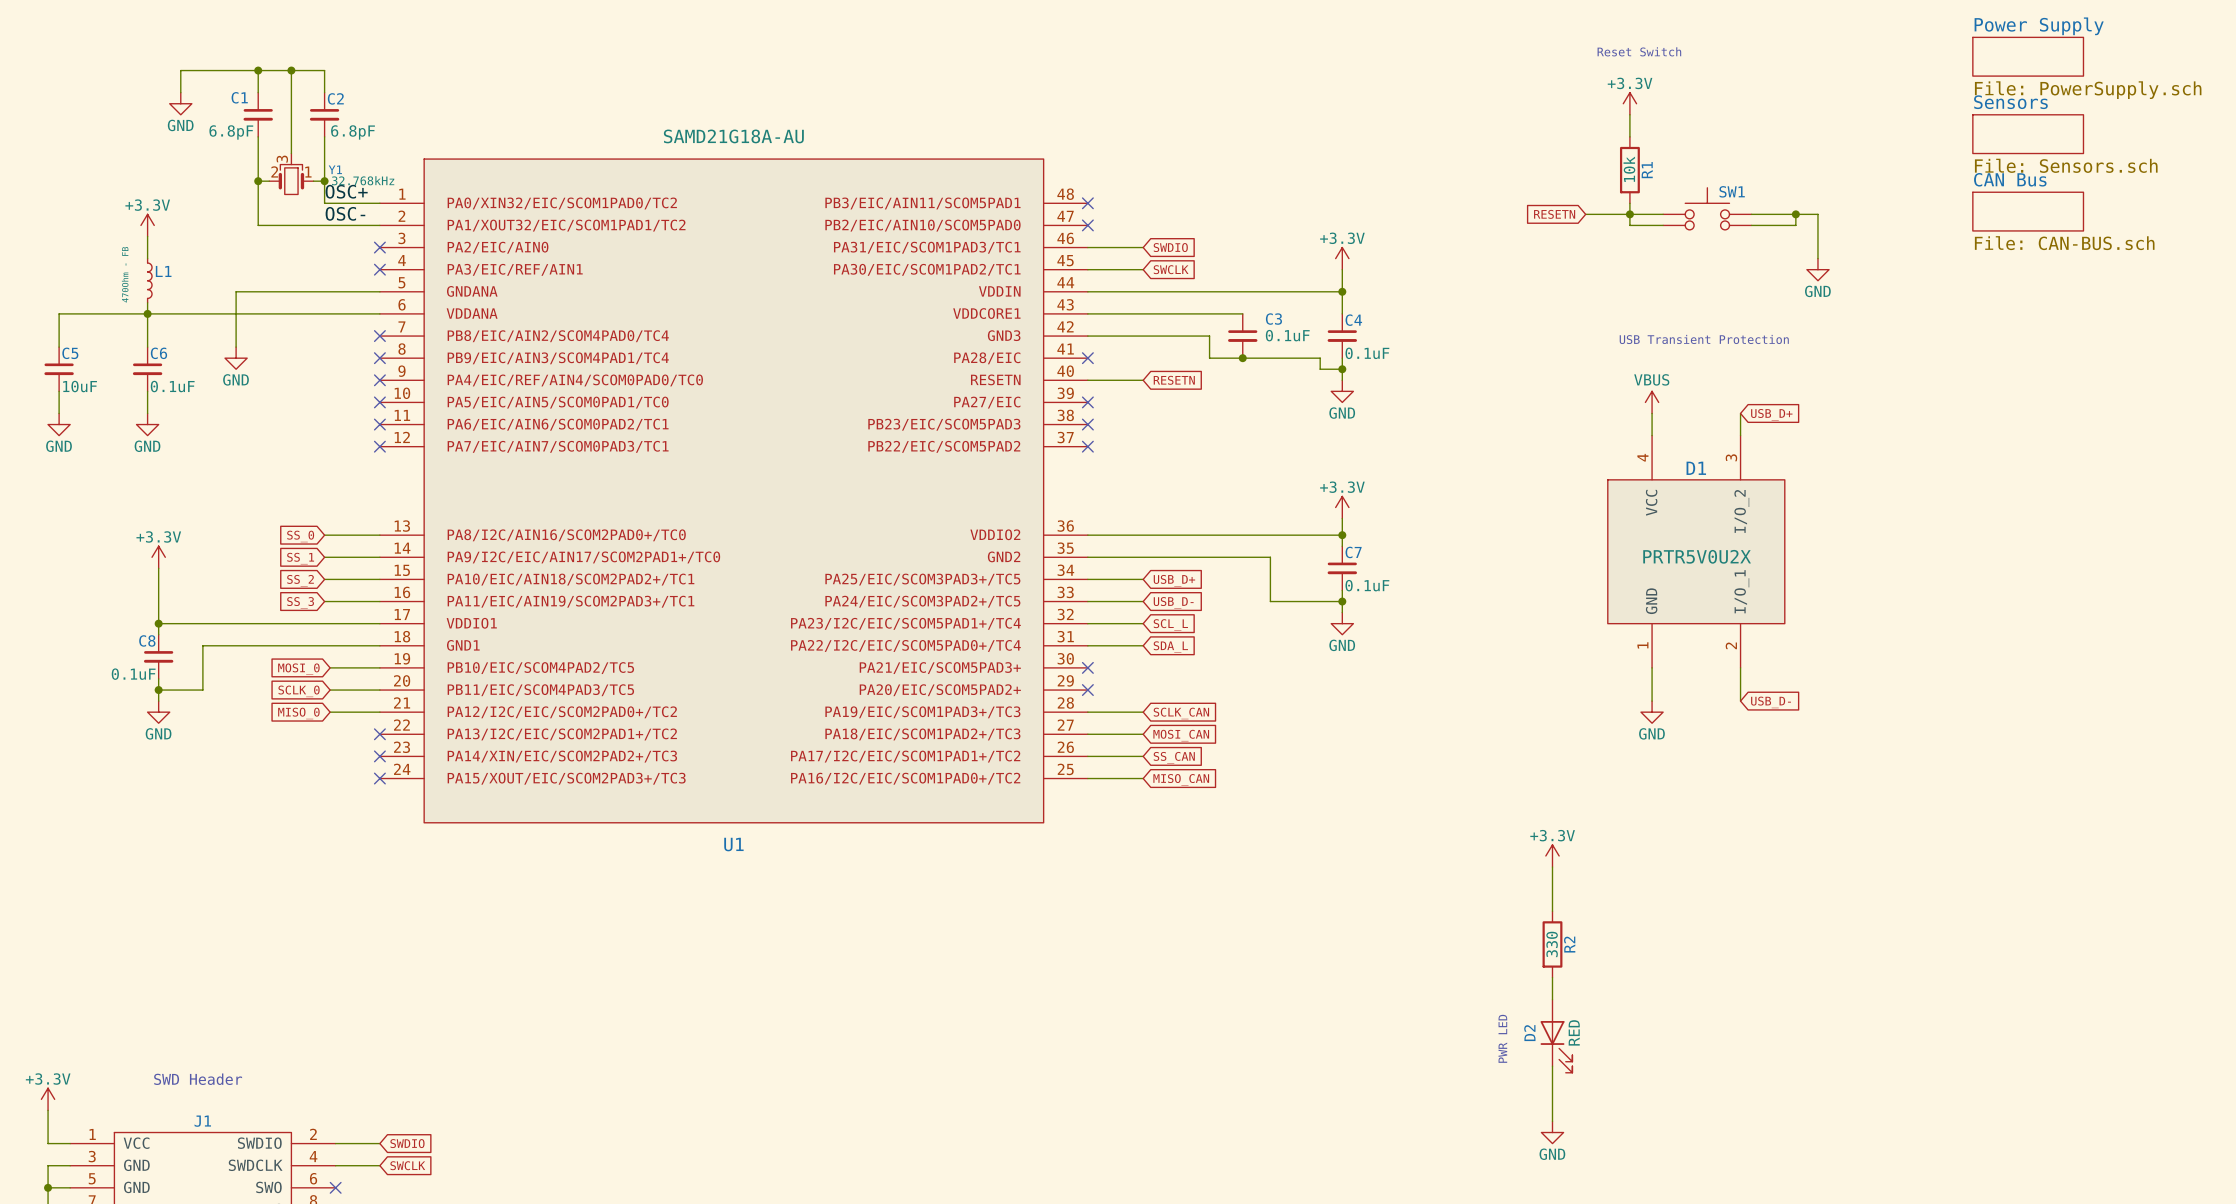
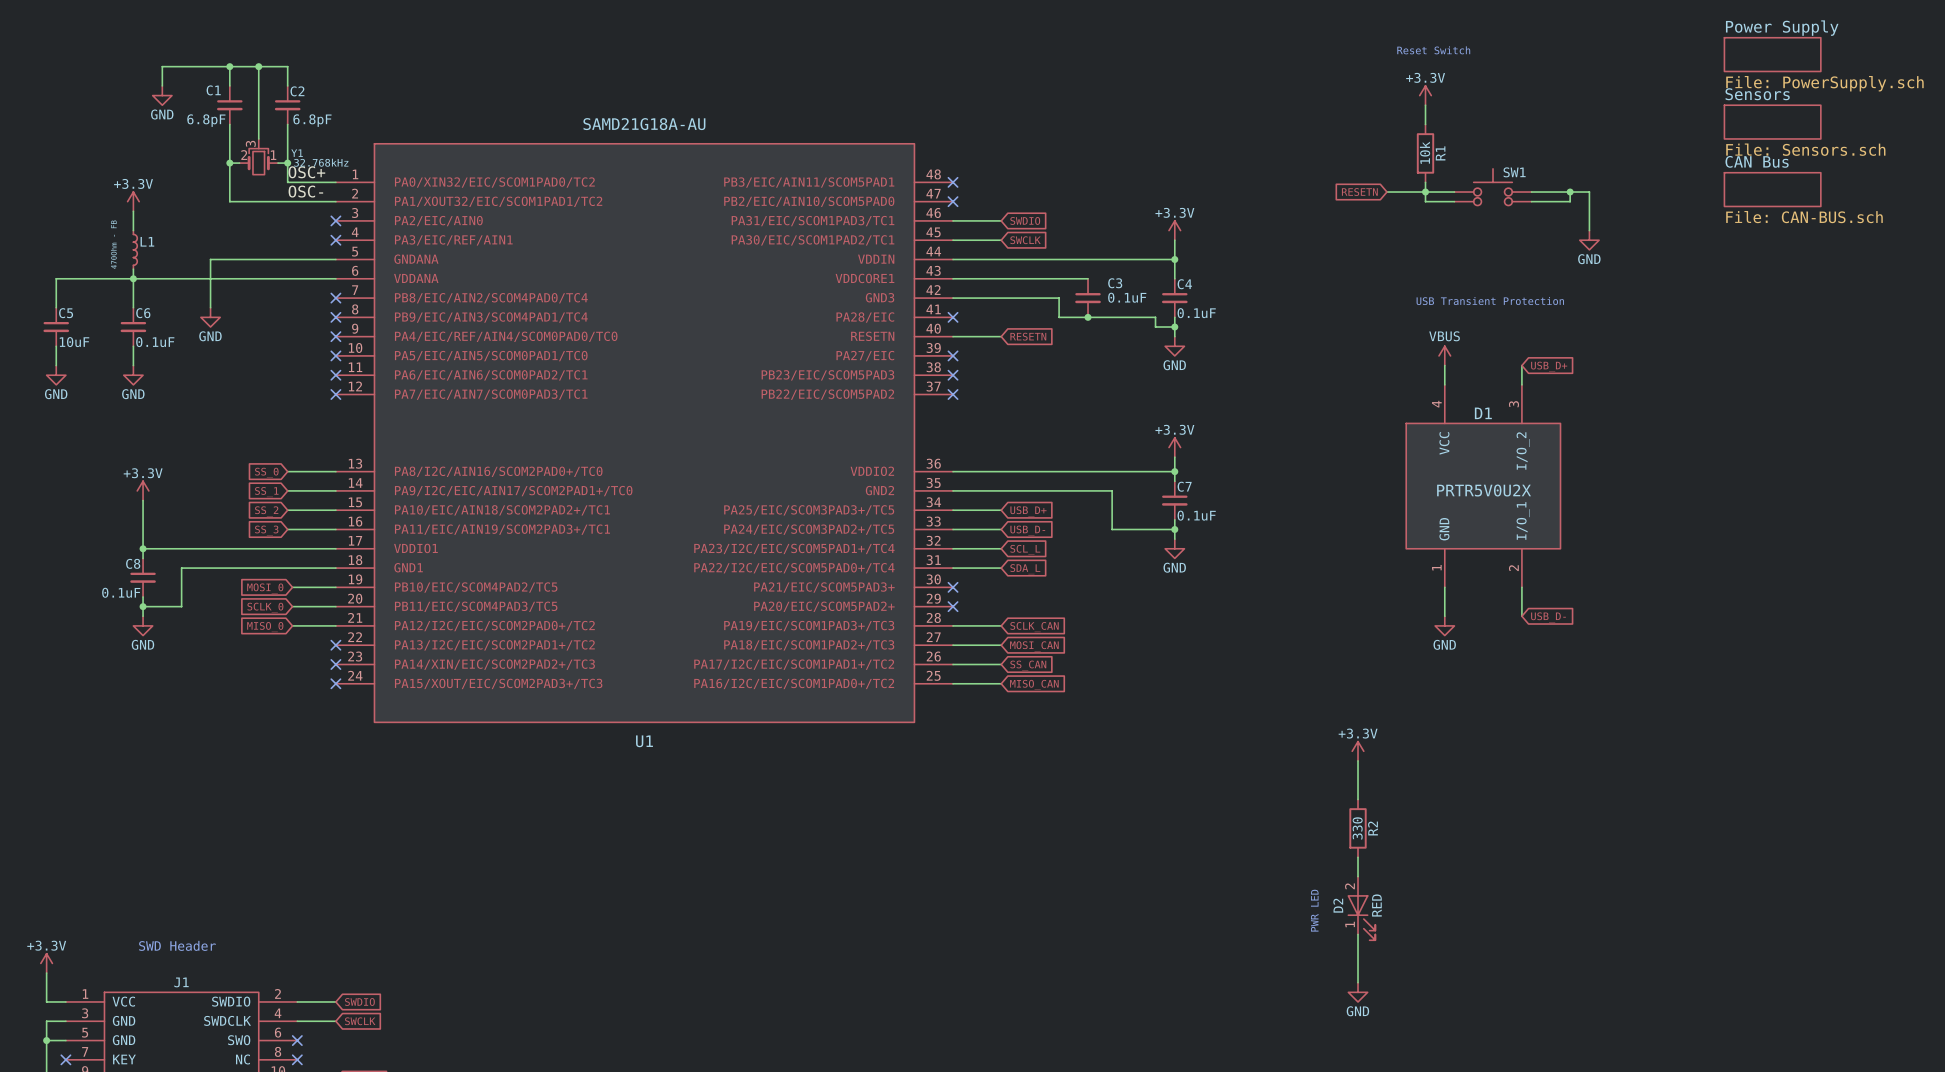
D2 pin number: none -> 2 (1349, 886)
D2 pin number: none -> 1 (1350, 924)

